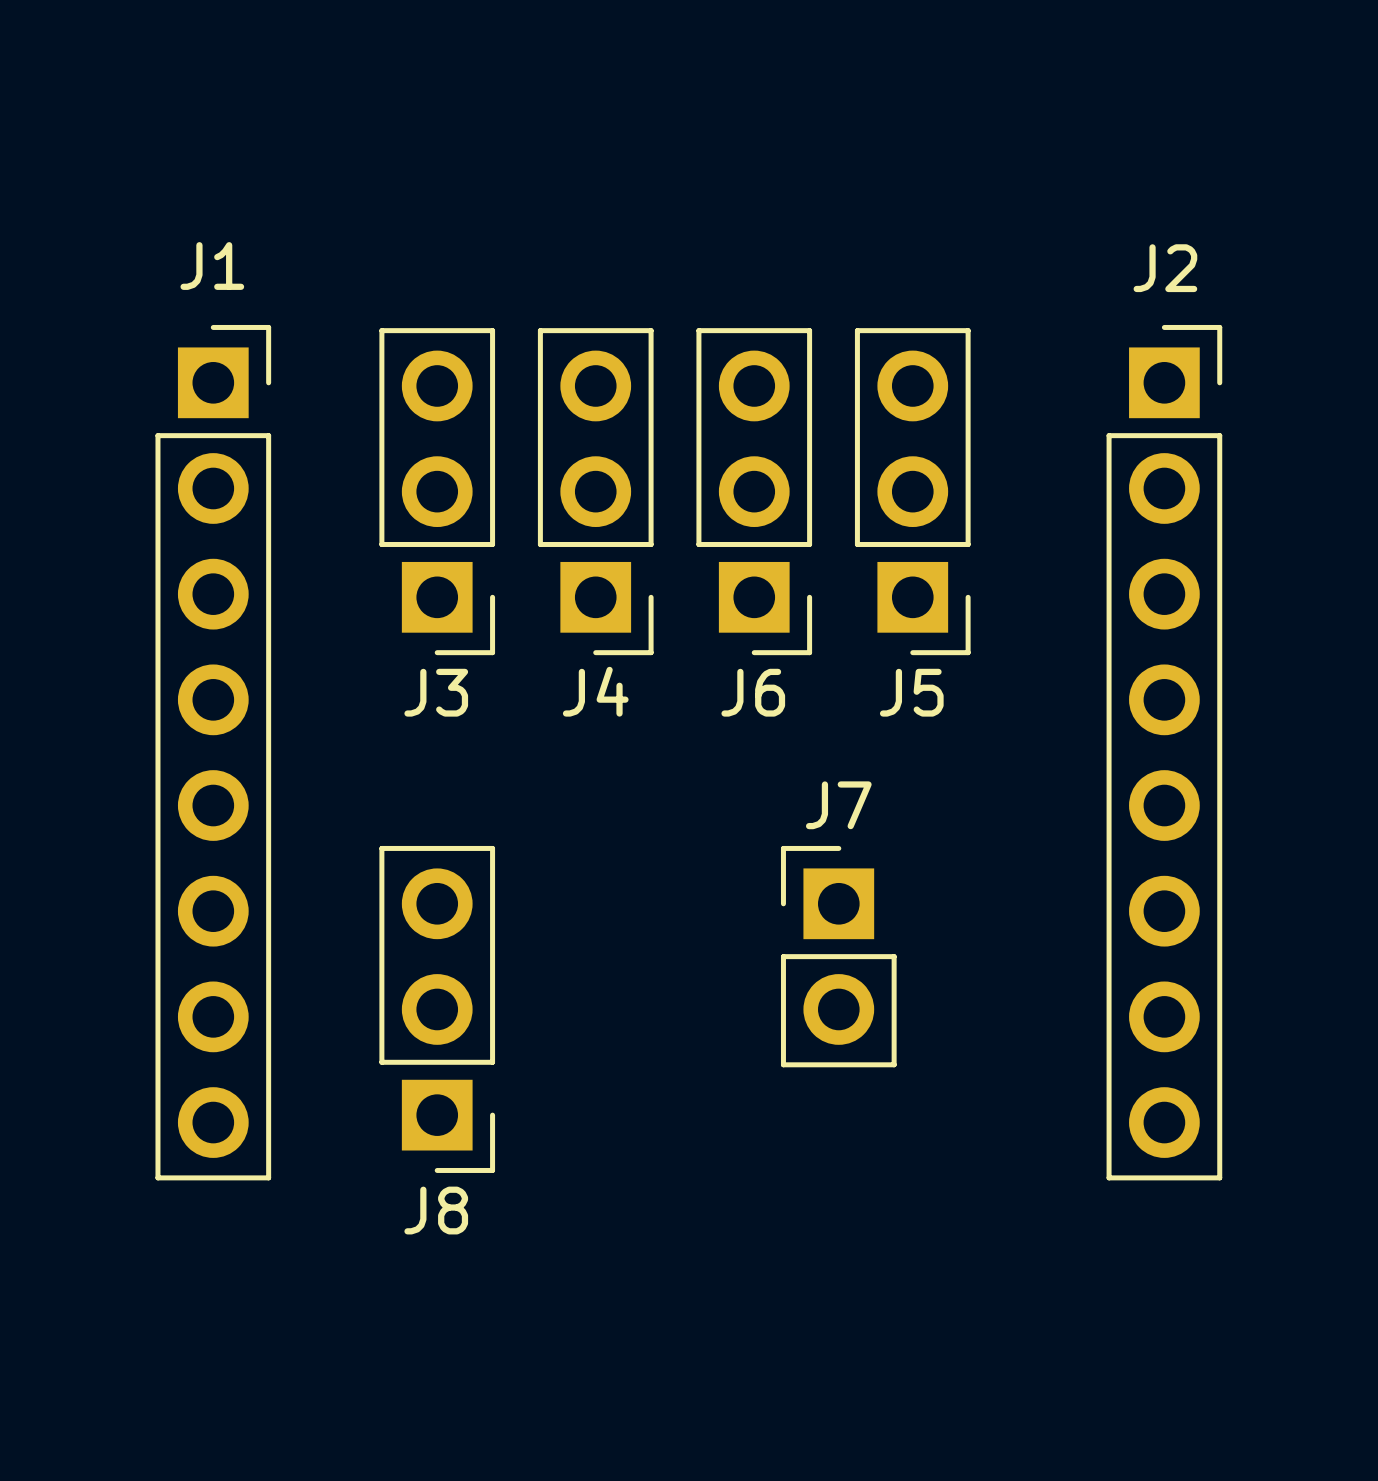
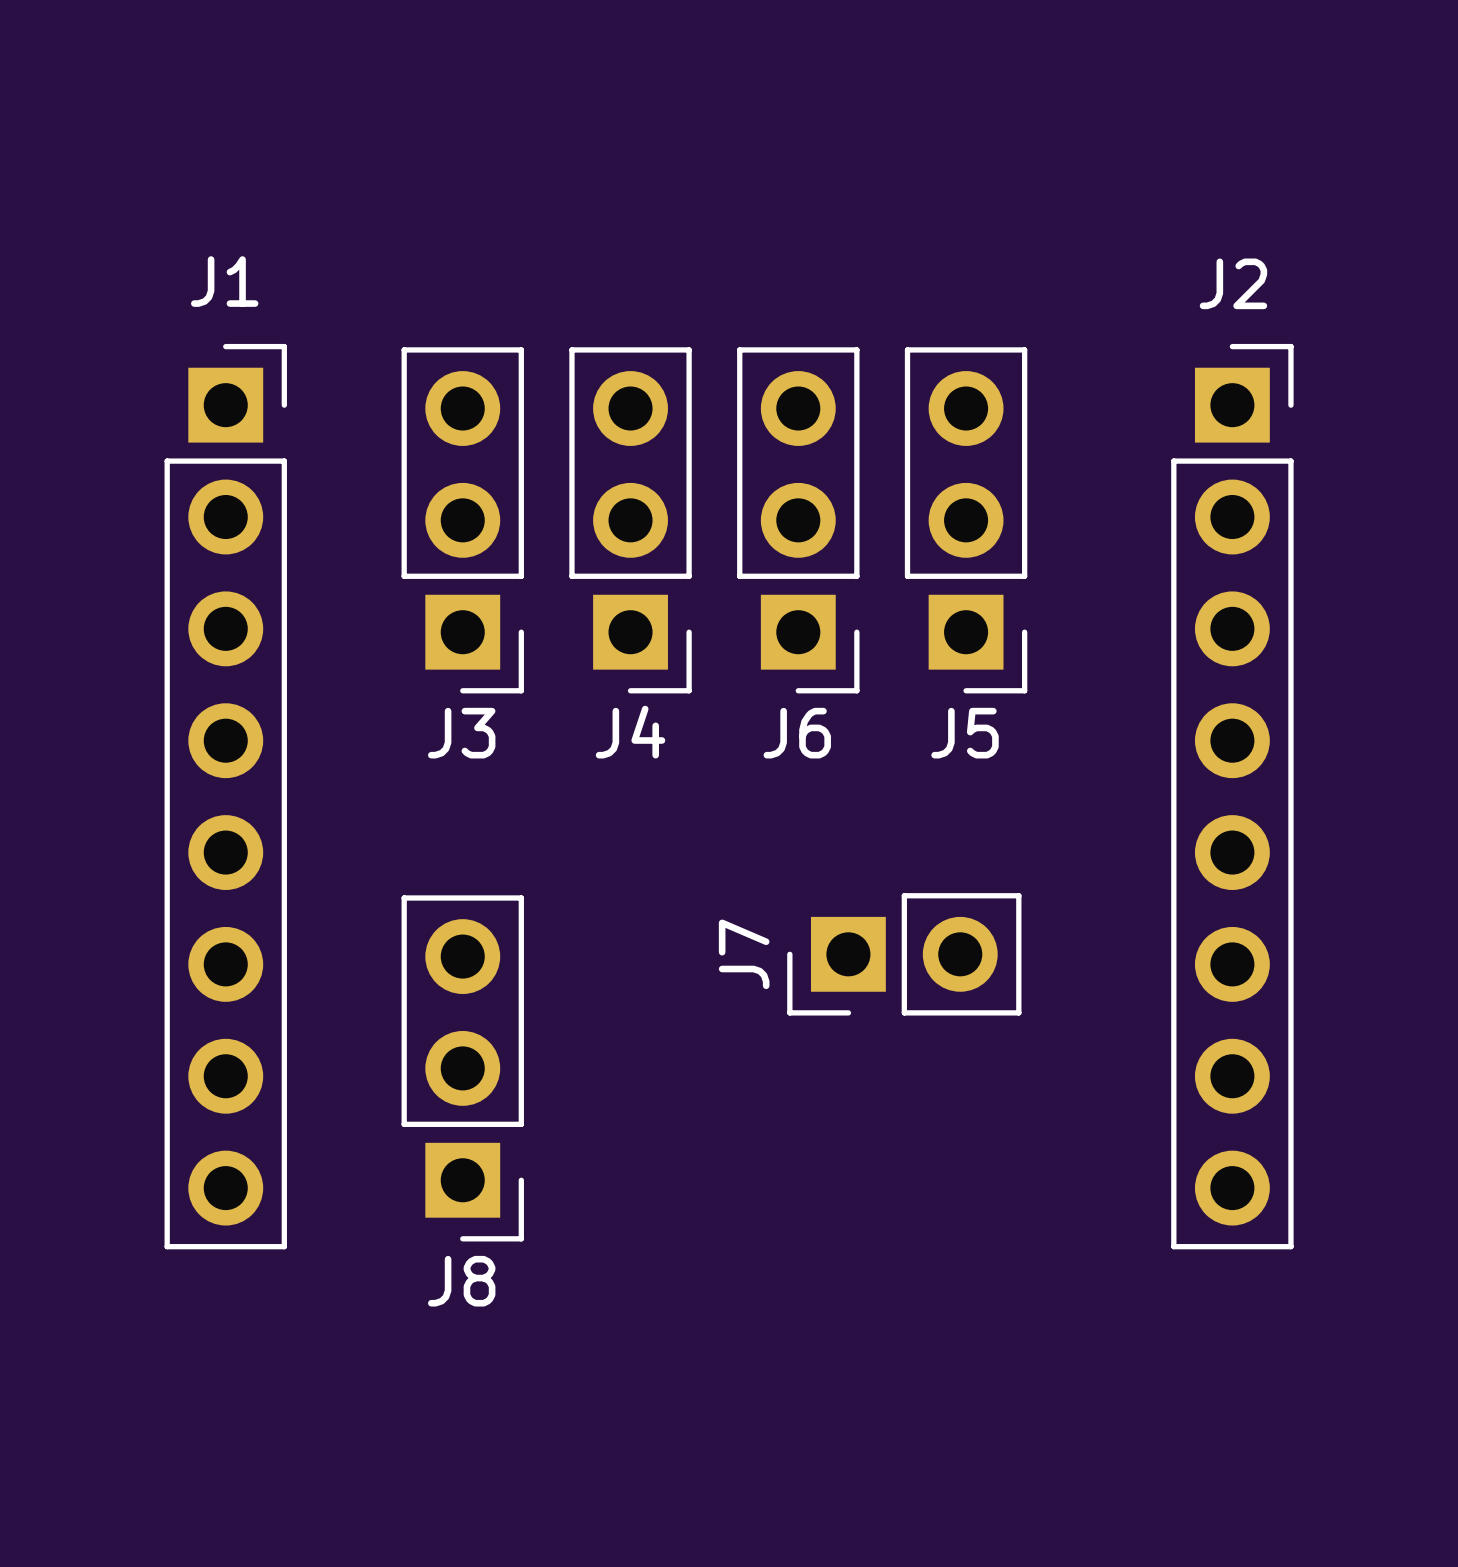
J7 rotation: 0° (838, 956) -> 90° counterclockwise (904, 954)

